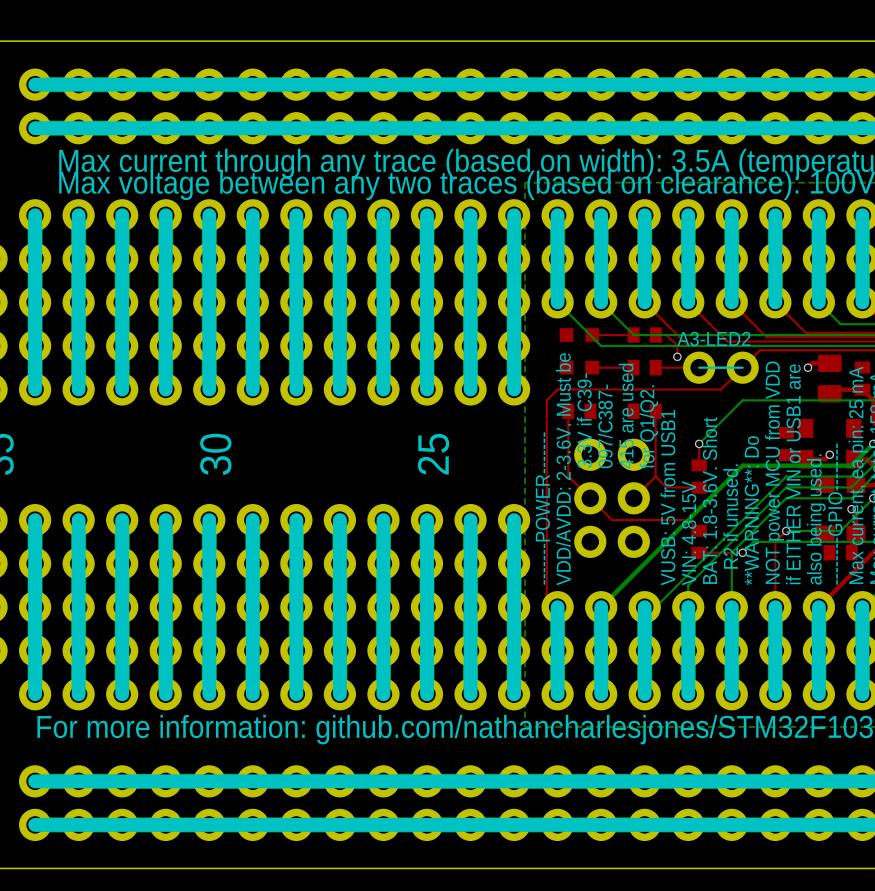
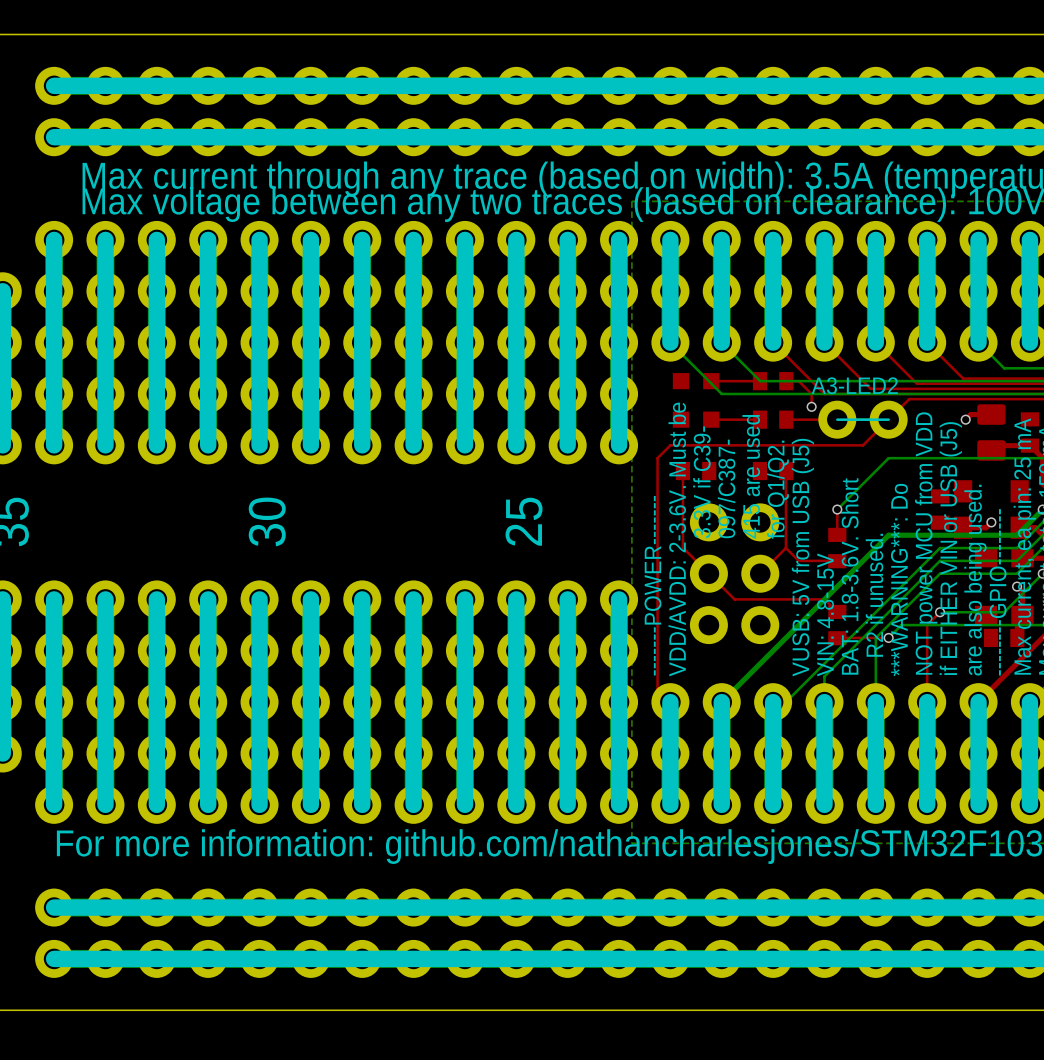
text: if EITHER VIN or USB1 are (793, 474) -> if EITHER VIN or USB (J5) (950, 548)
text: VUSB: 5V from USB1 (667, 497) -> VUSB: 5V from USB (J5) (802, 557)
text: **WARNING**: Do (751, 510) -> ***WARNING***: Do (899, 579)
text: also being used. (816, 519) -> are also being used. (975, 580)

